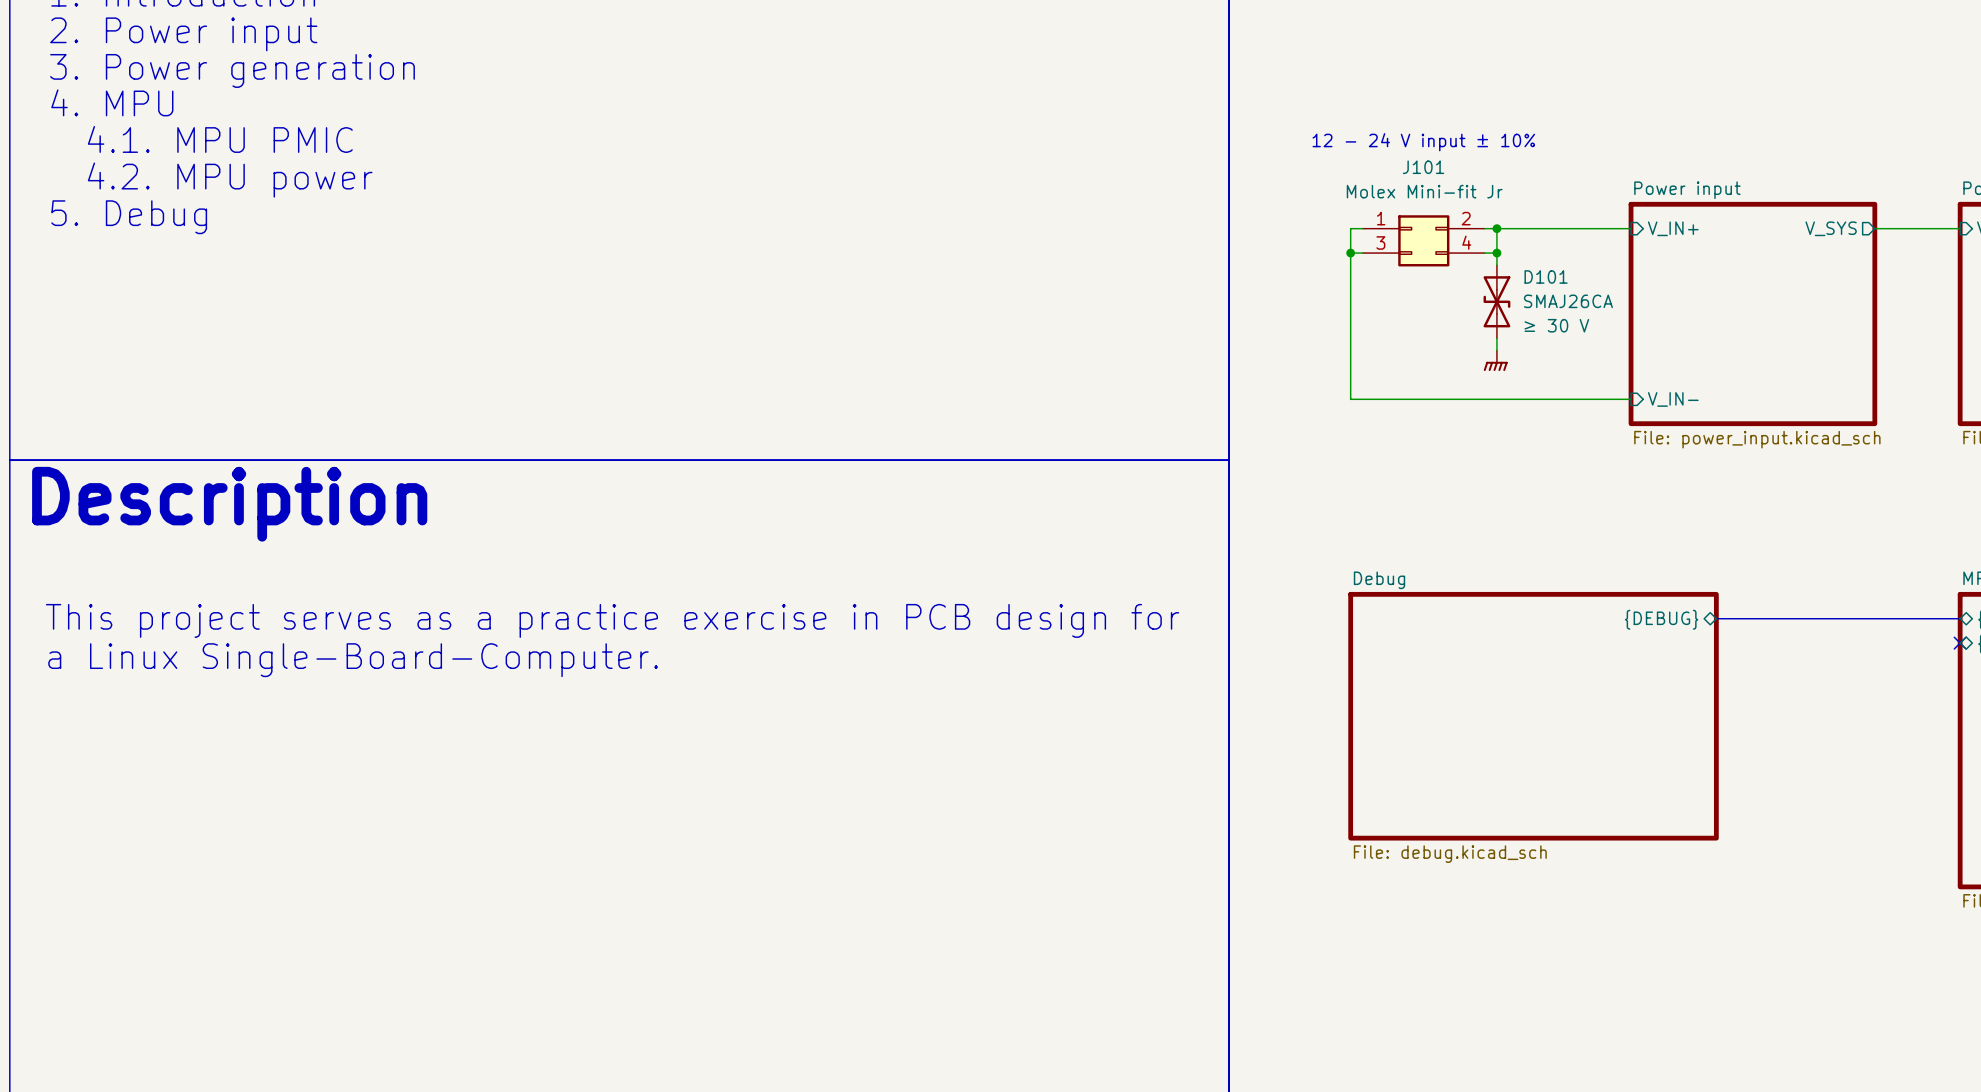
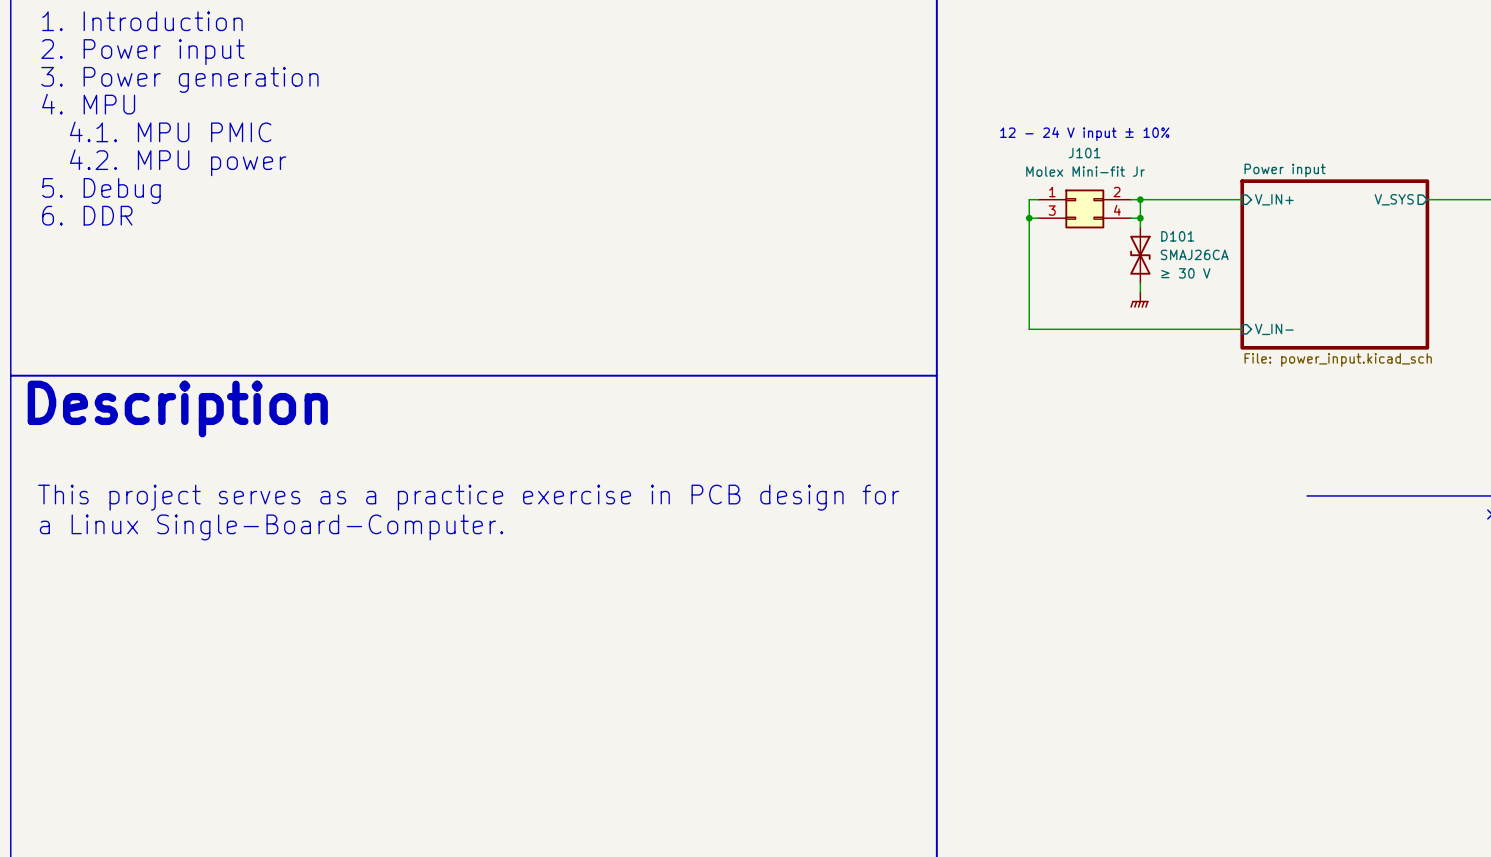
text: none -> 6. DDR (87, 215)
sheet pin: {DEBUG} (1661, 619) -> none
sheet Debug: File: debug.kicad_sch (1533, 716) -> none

